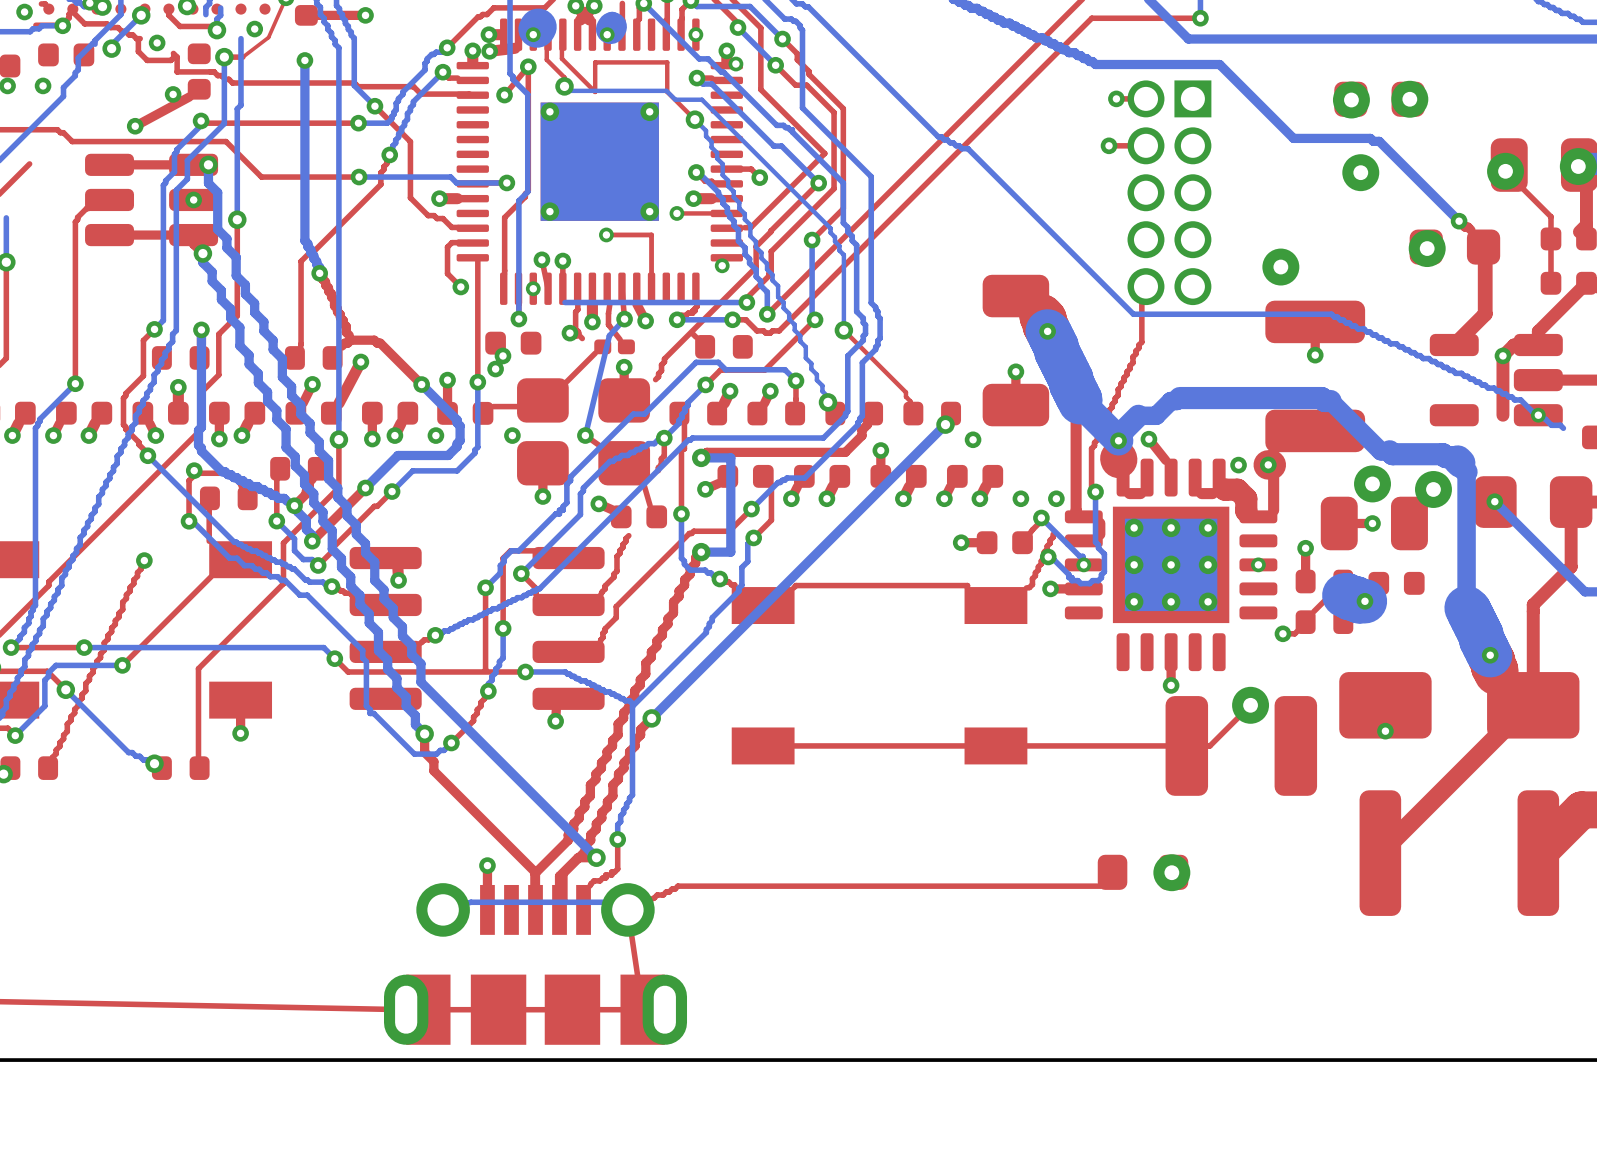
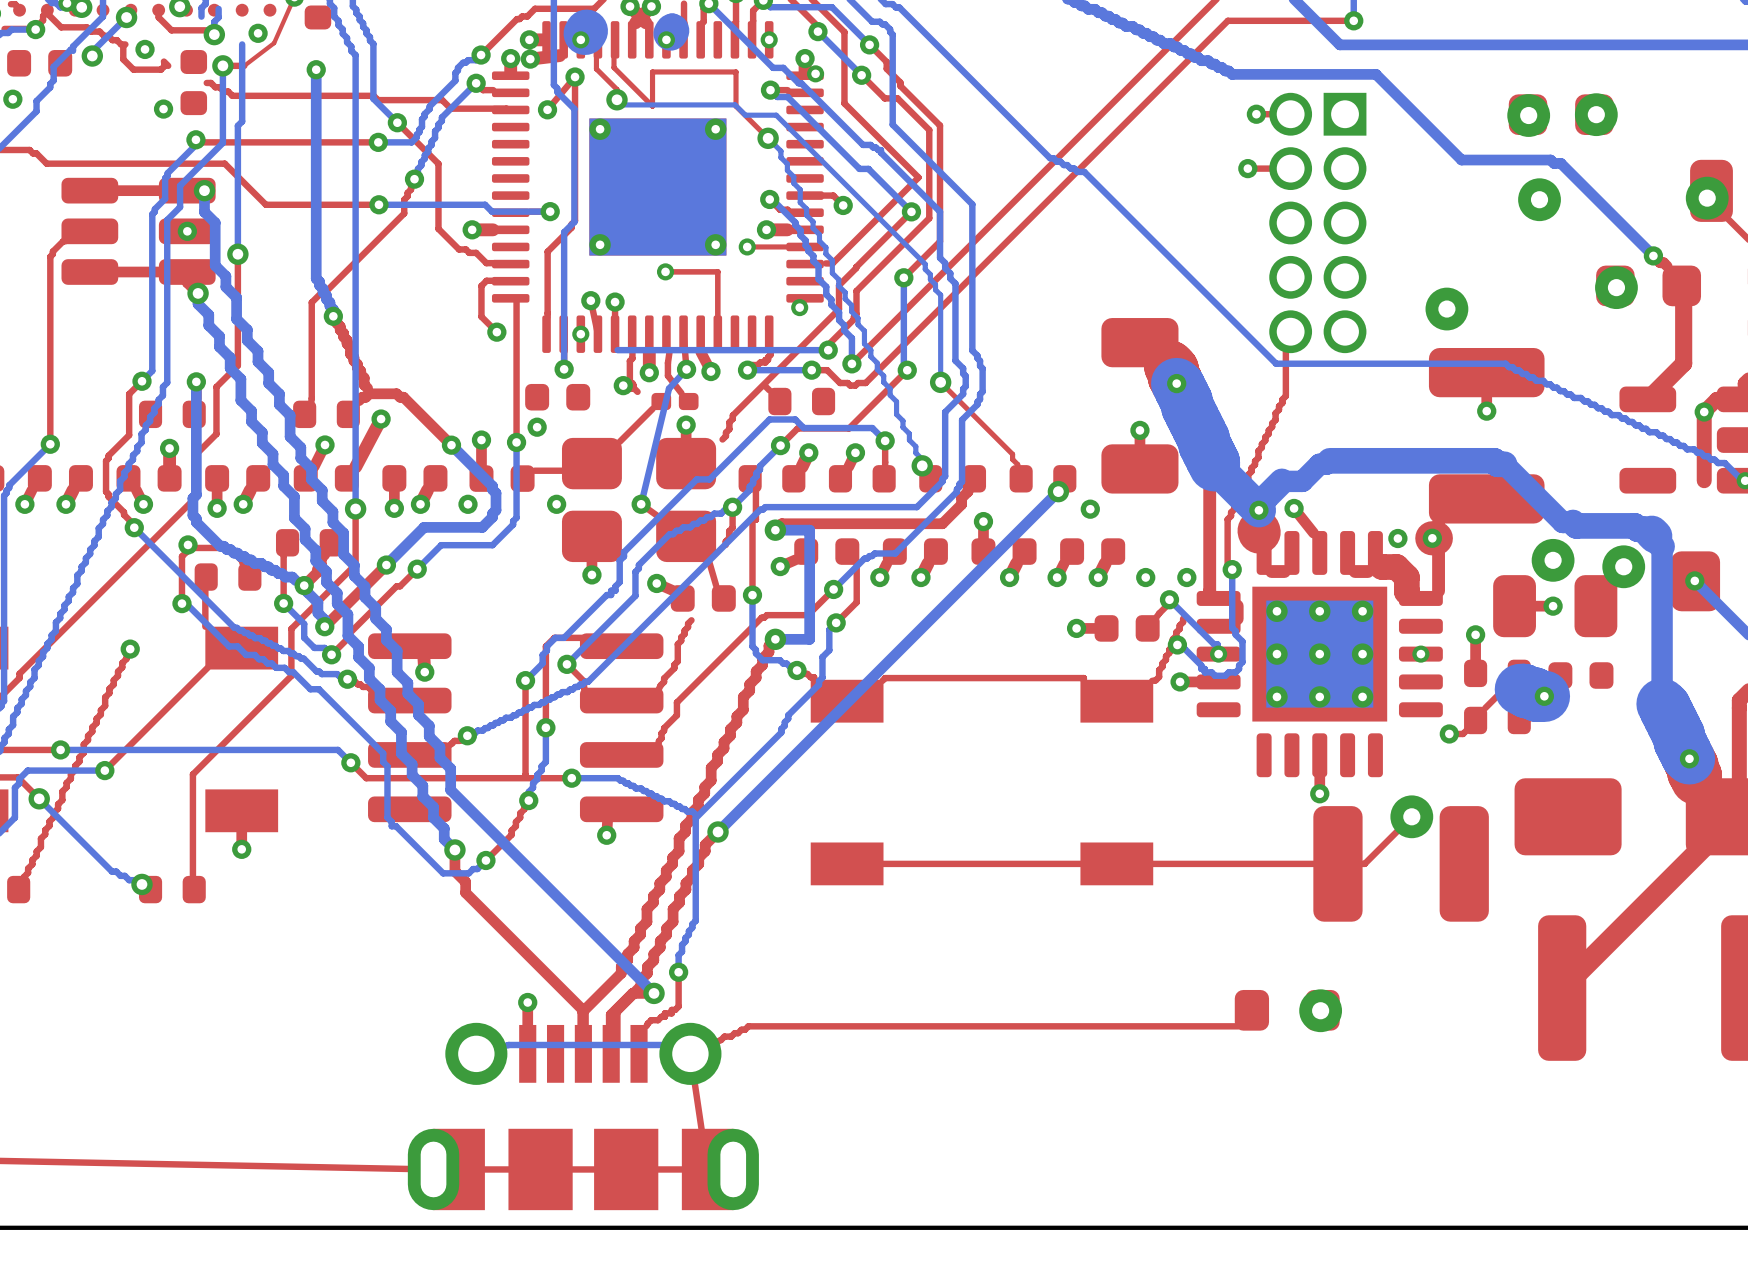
top track: (365, 15) (316, 15) -> none
via: (365, 15) -> none
top track: (177, 57) (177, 71) (210, 71) -> none
top track: (189, 96) (135, 126) -> none
via: (135, 126) -> none
via: (502, 355) -> none
via: (1385, 731) -> none

